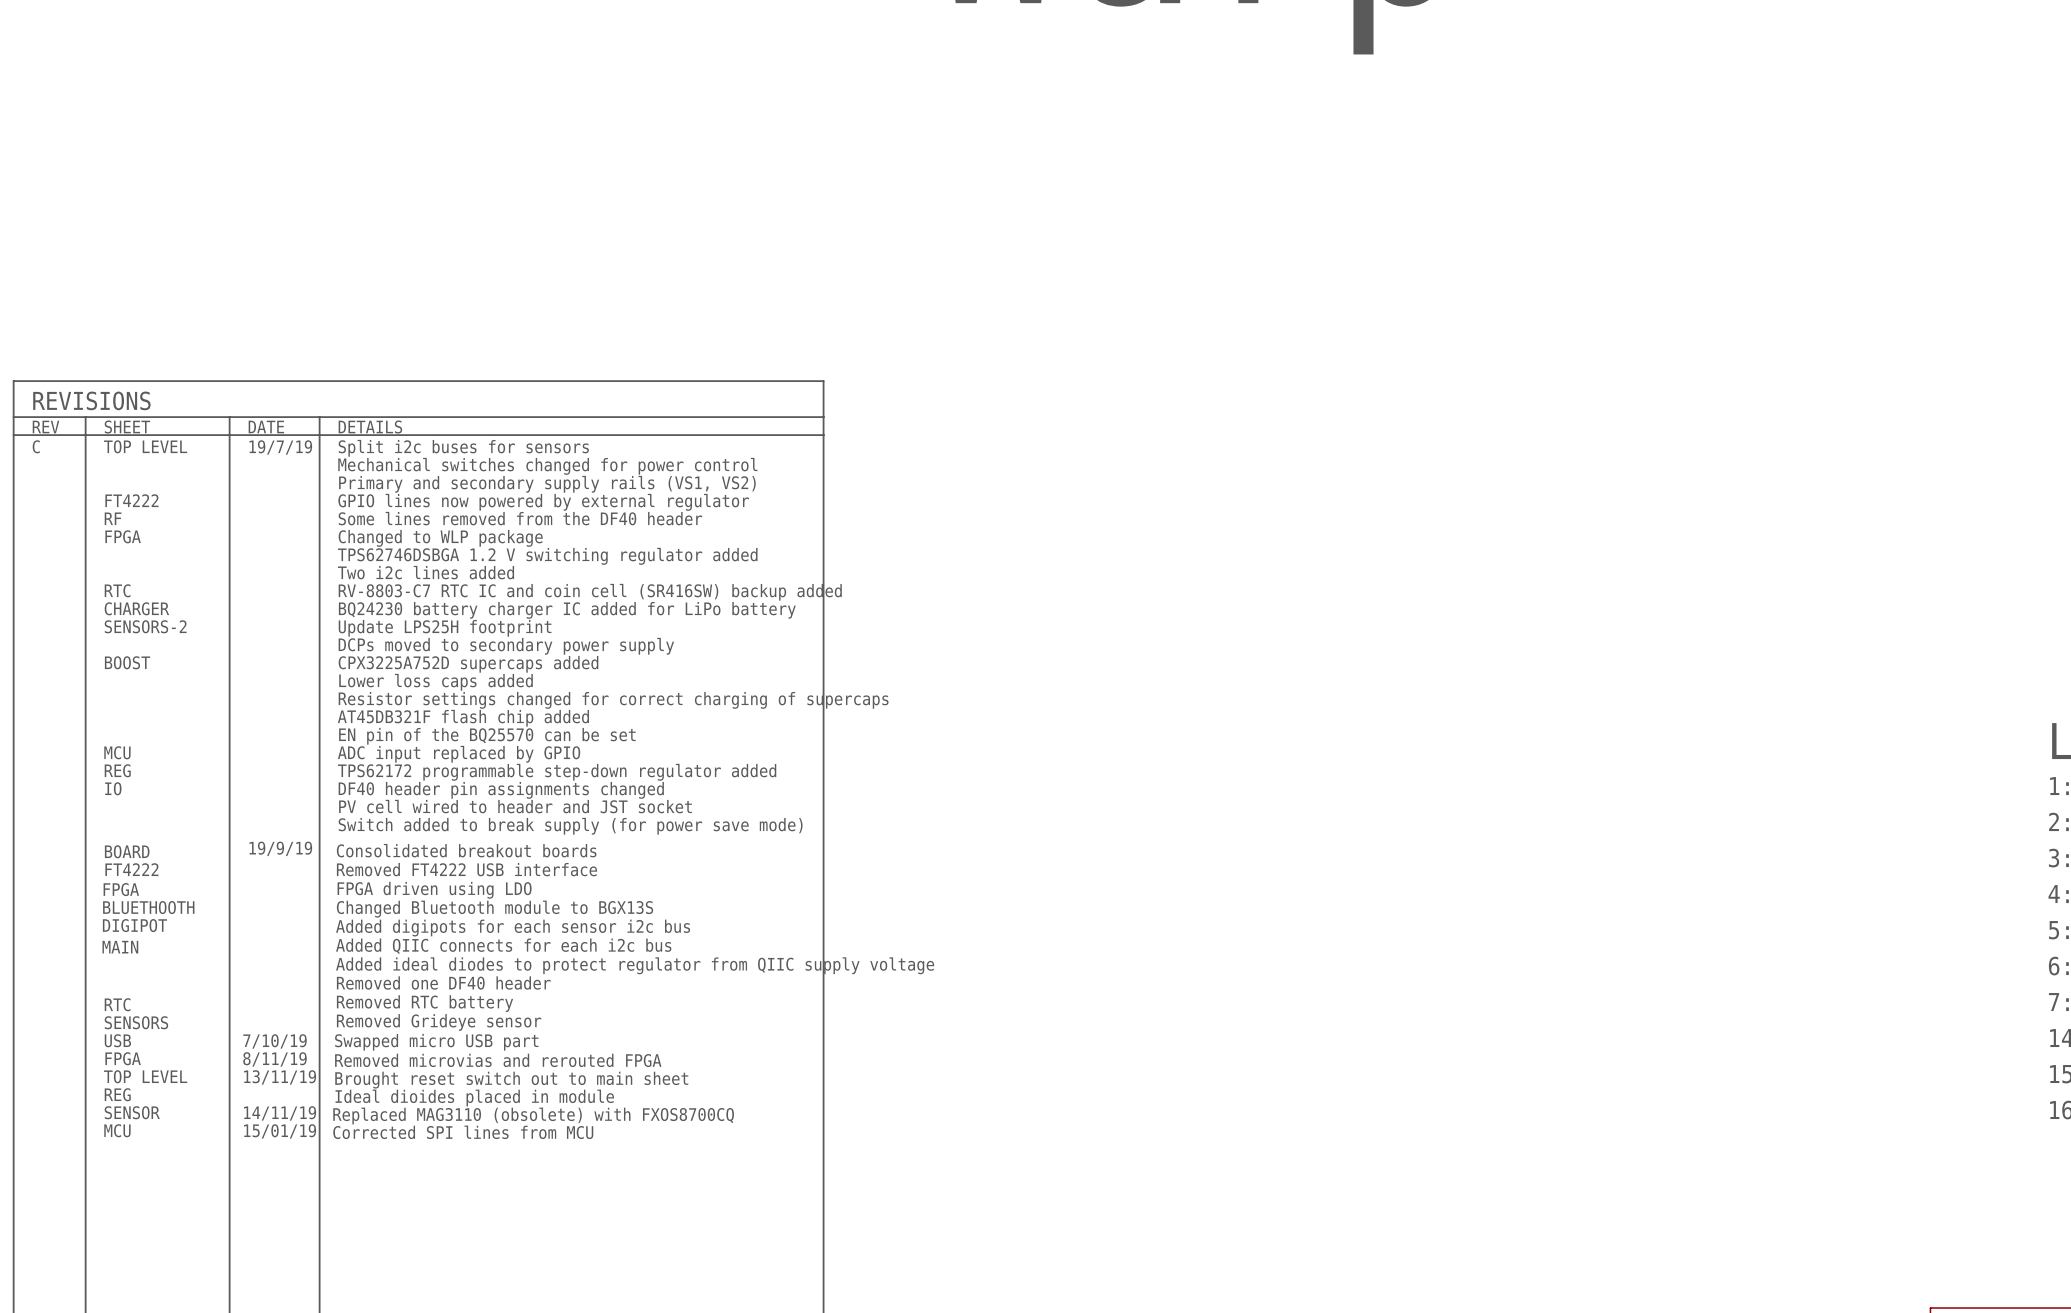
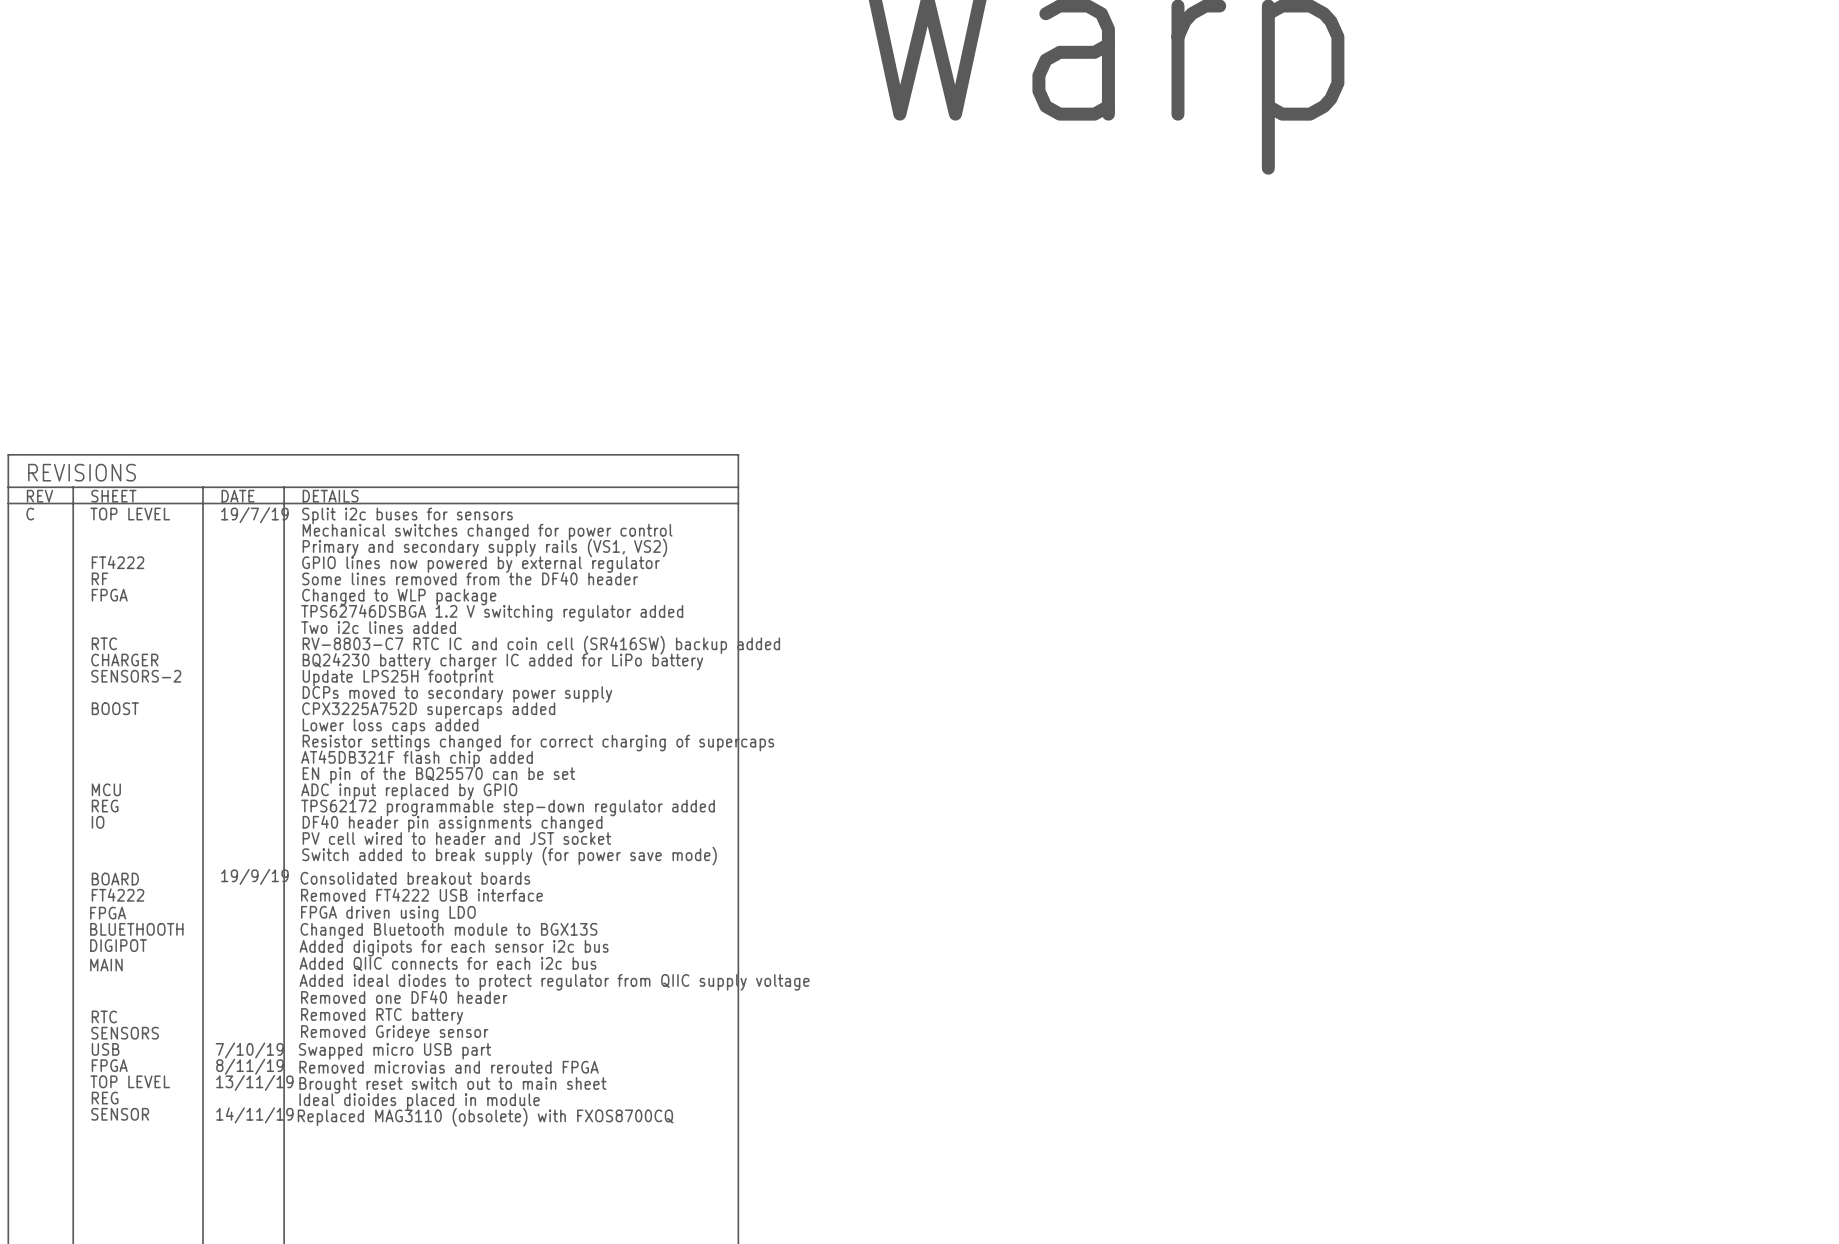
text: MCU (117, 1130) -> none
text: 15/01/19 (280, 1131) -> none
text: Corrected SPI lines from MCU (463, 1132) -> none

